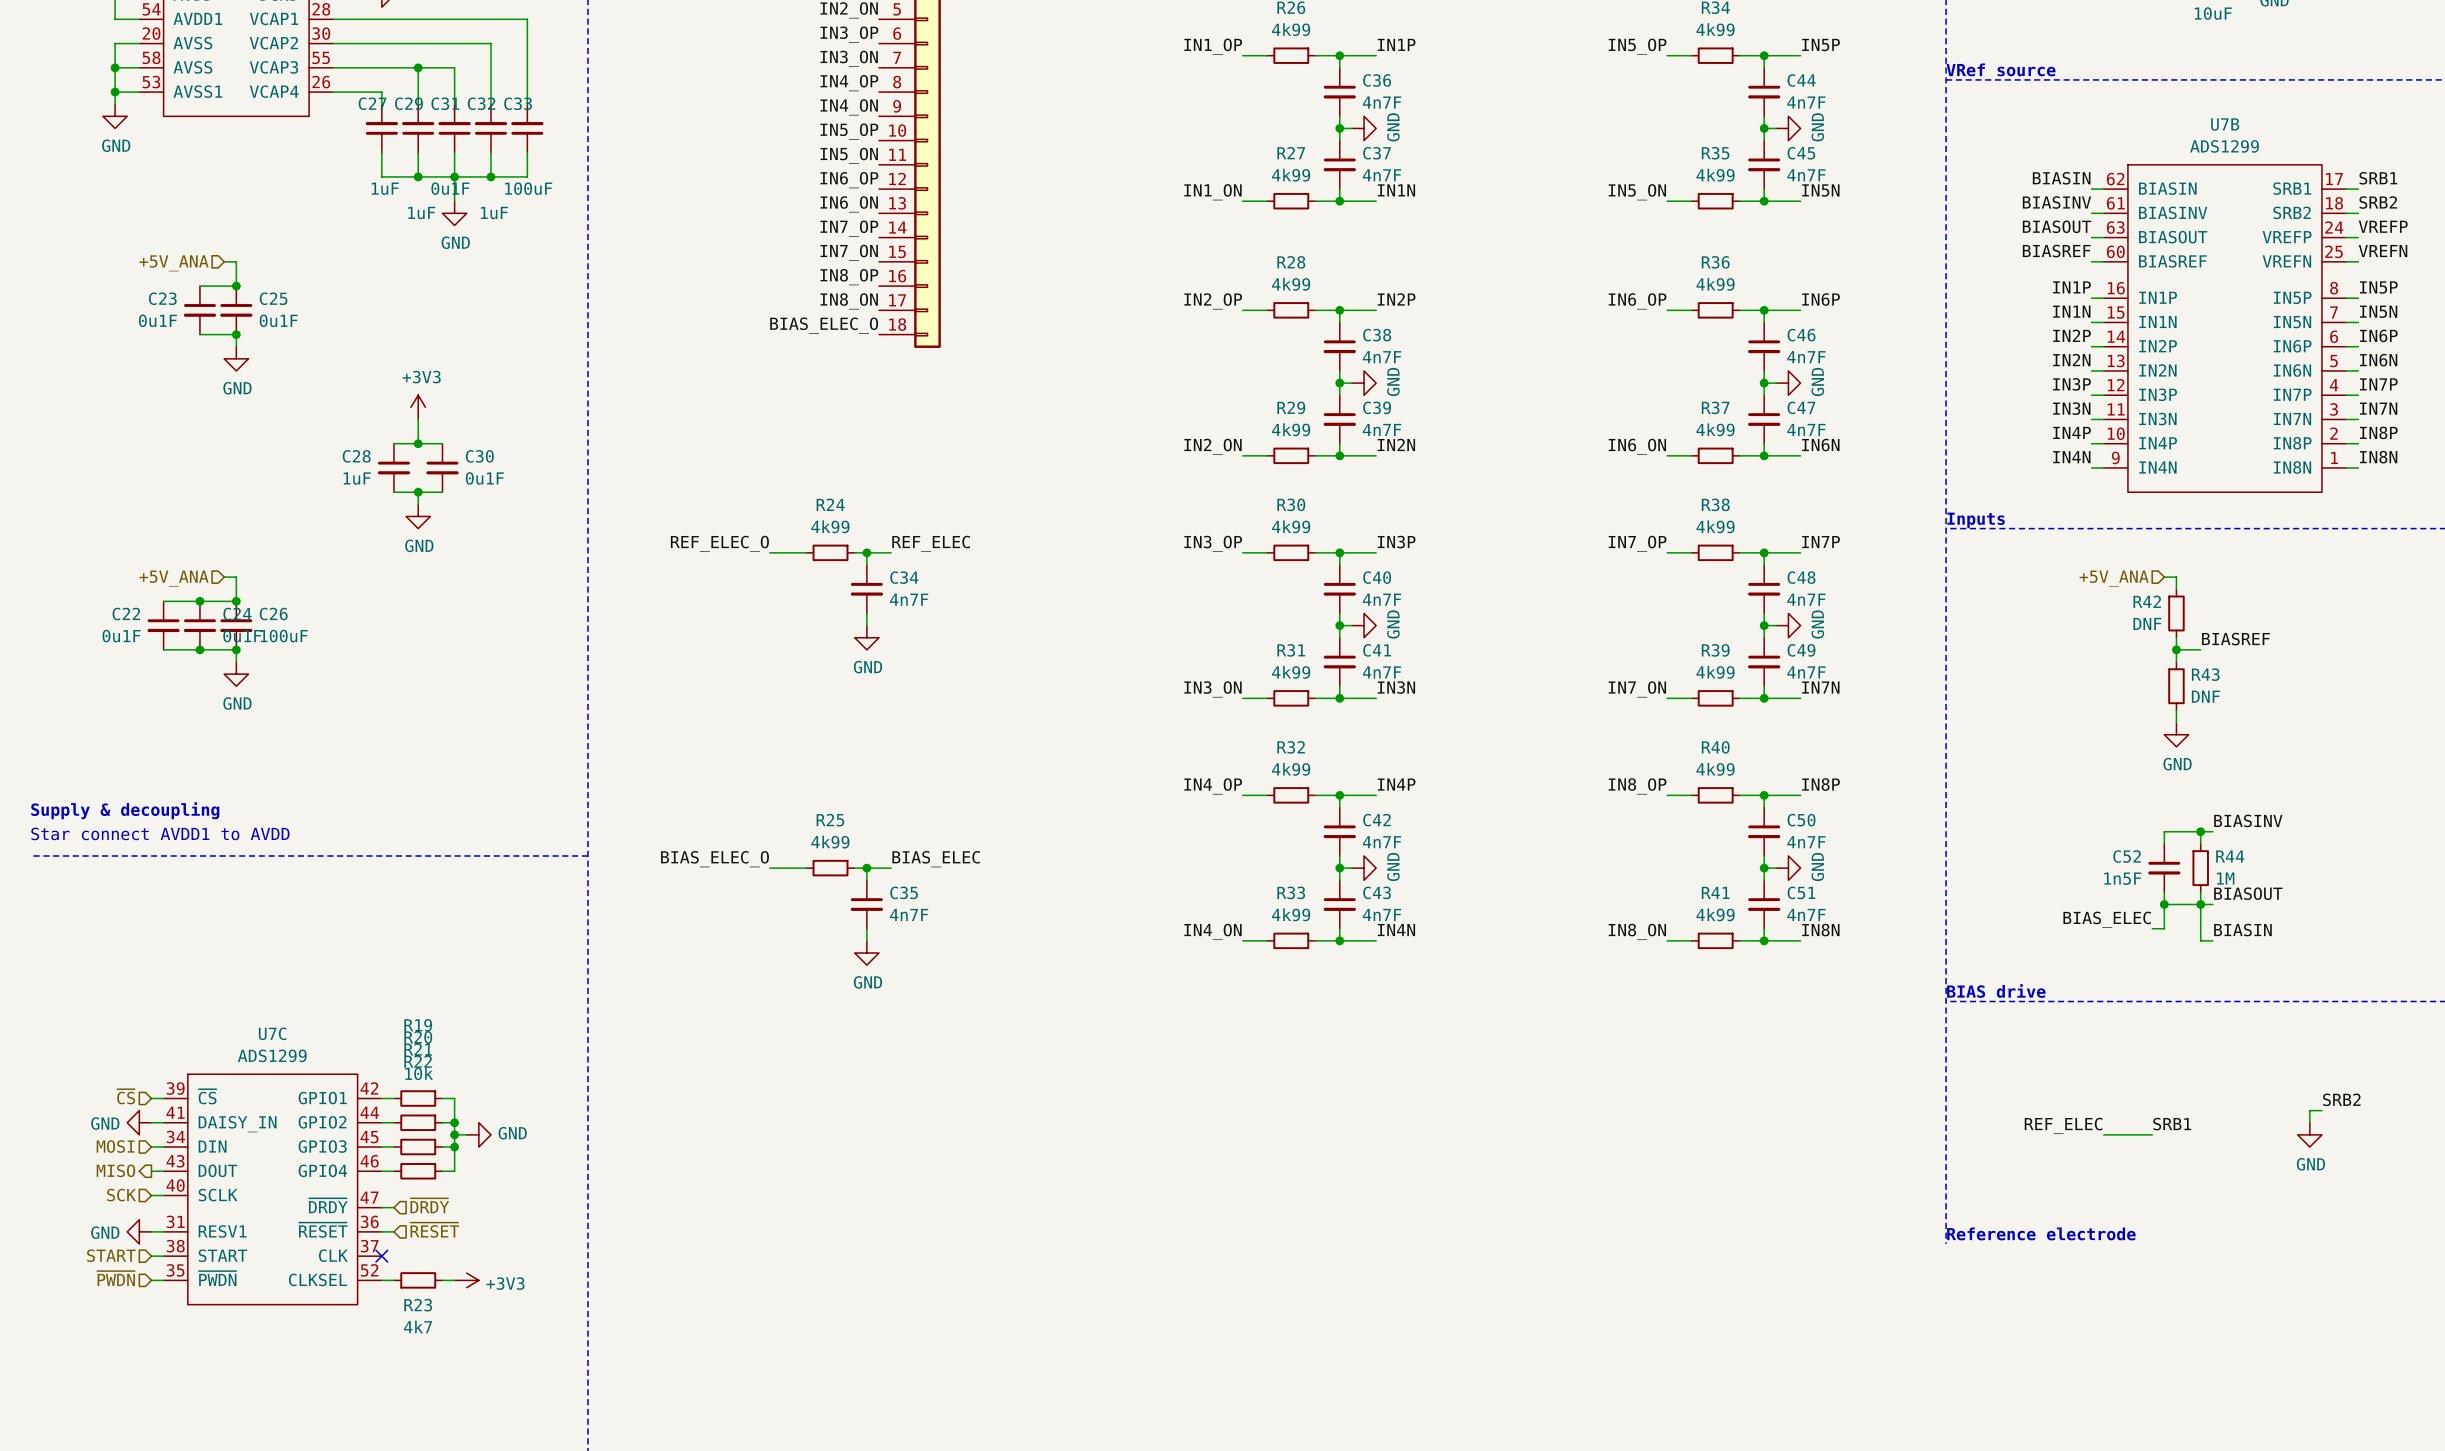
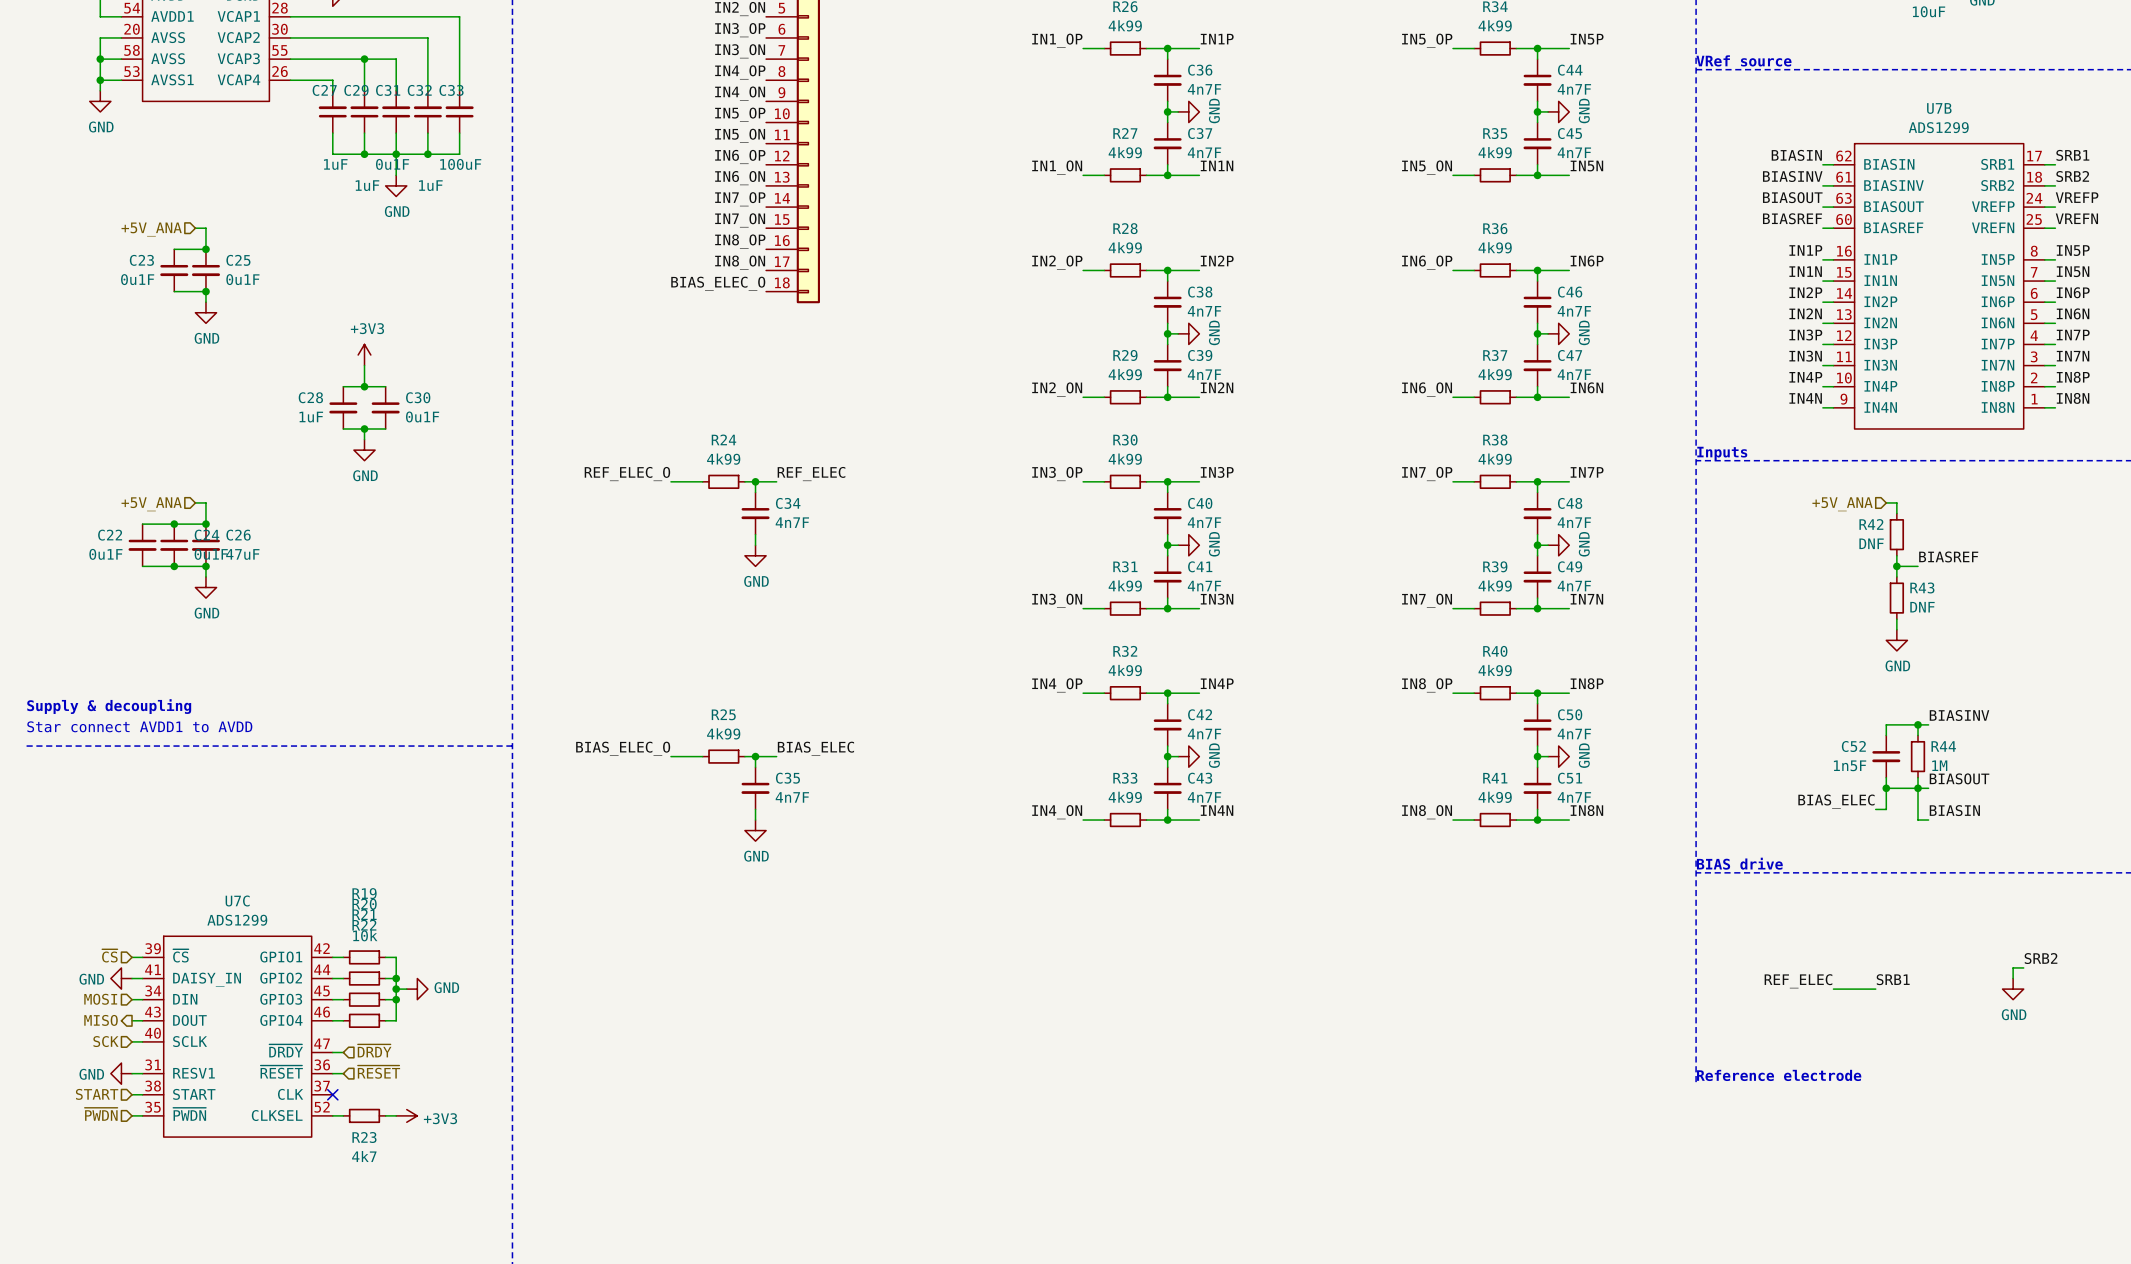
C26 value: 100uF (284, 636) -> 47uF (242, 554)

